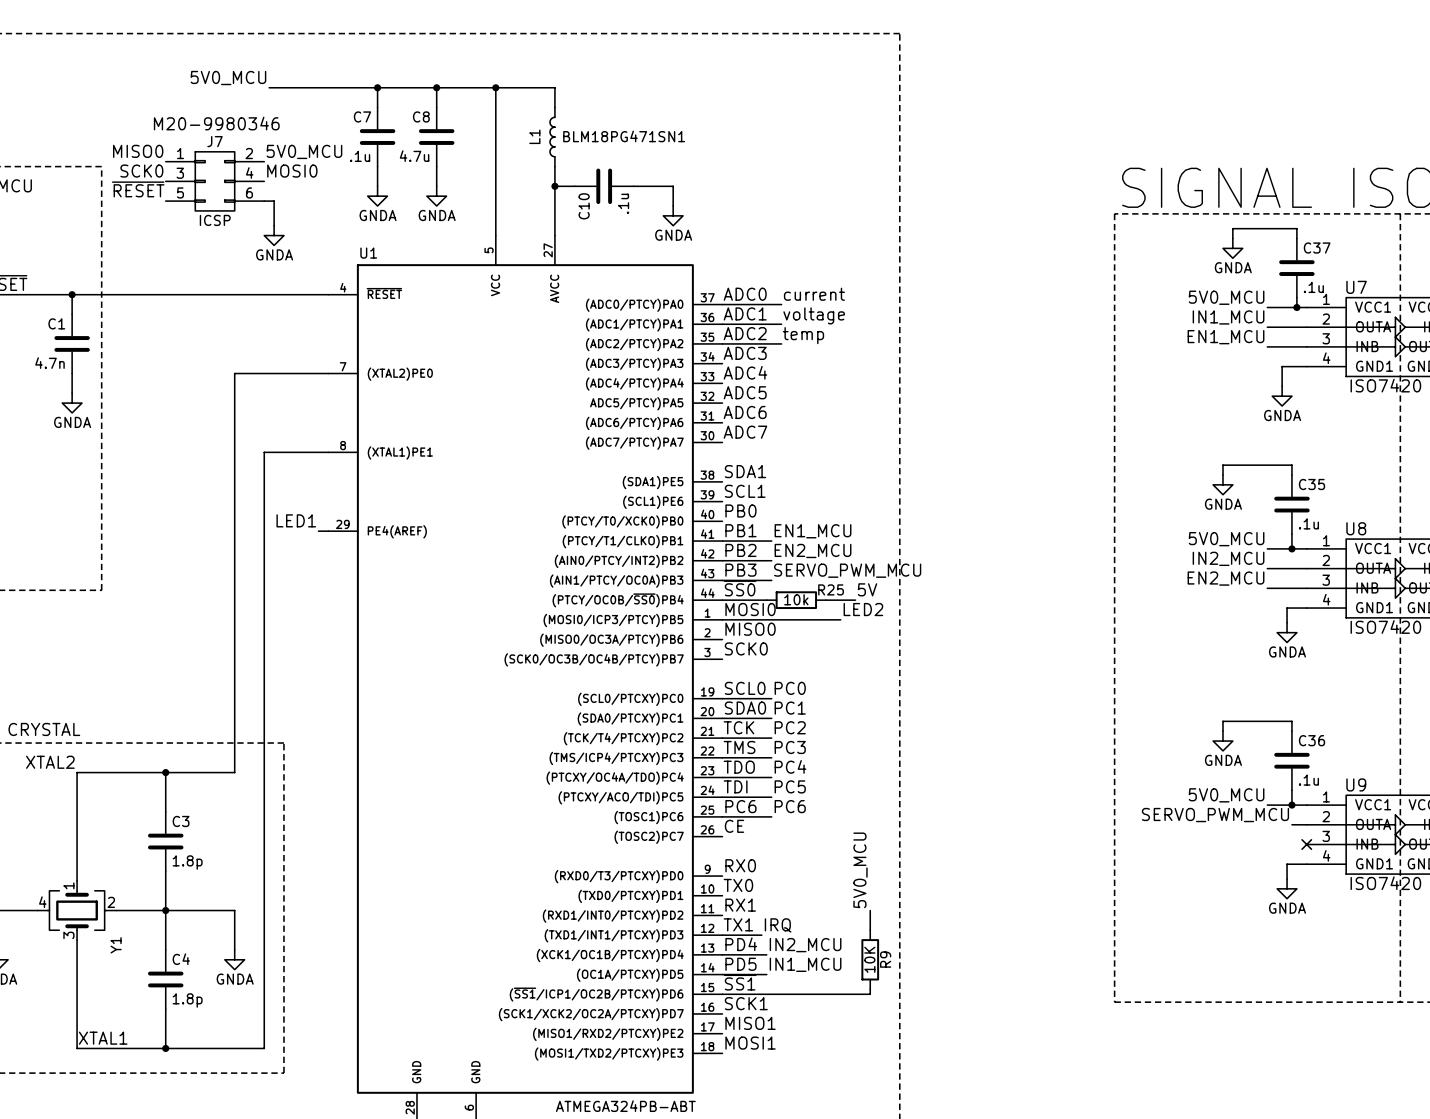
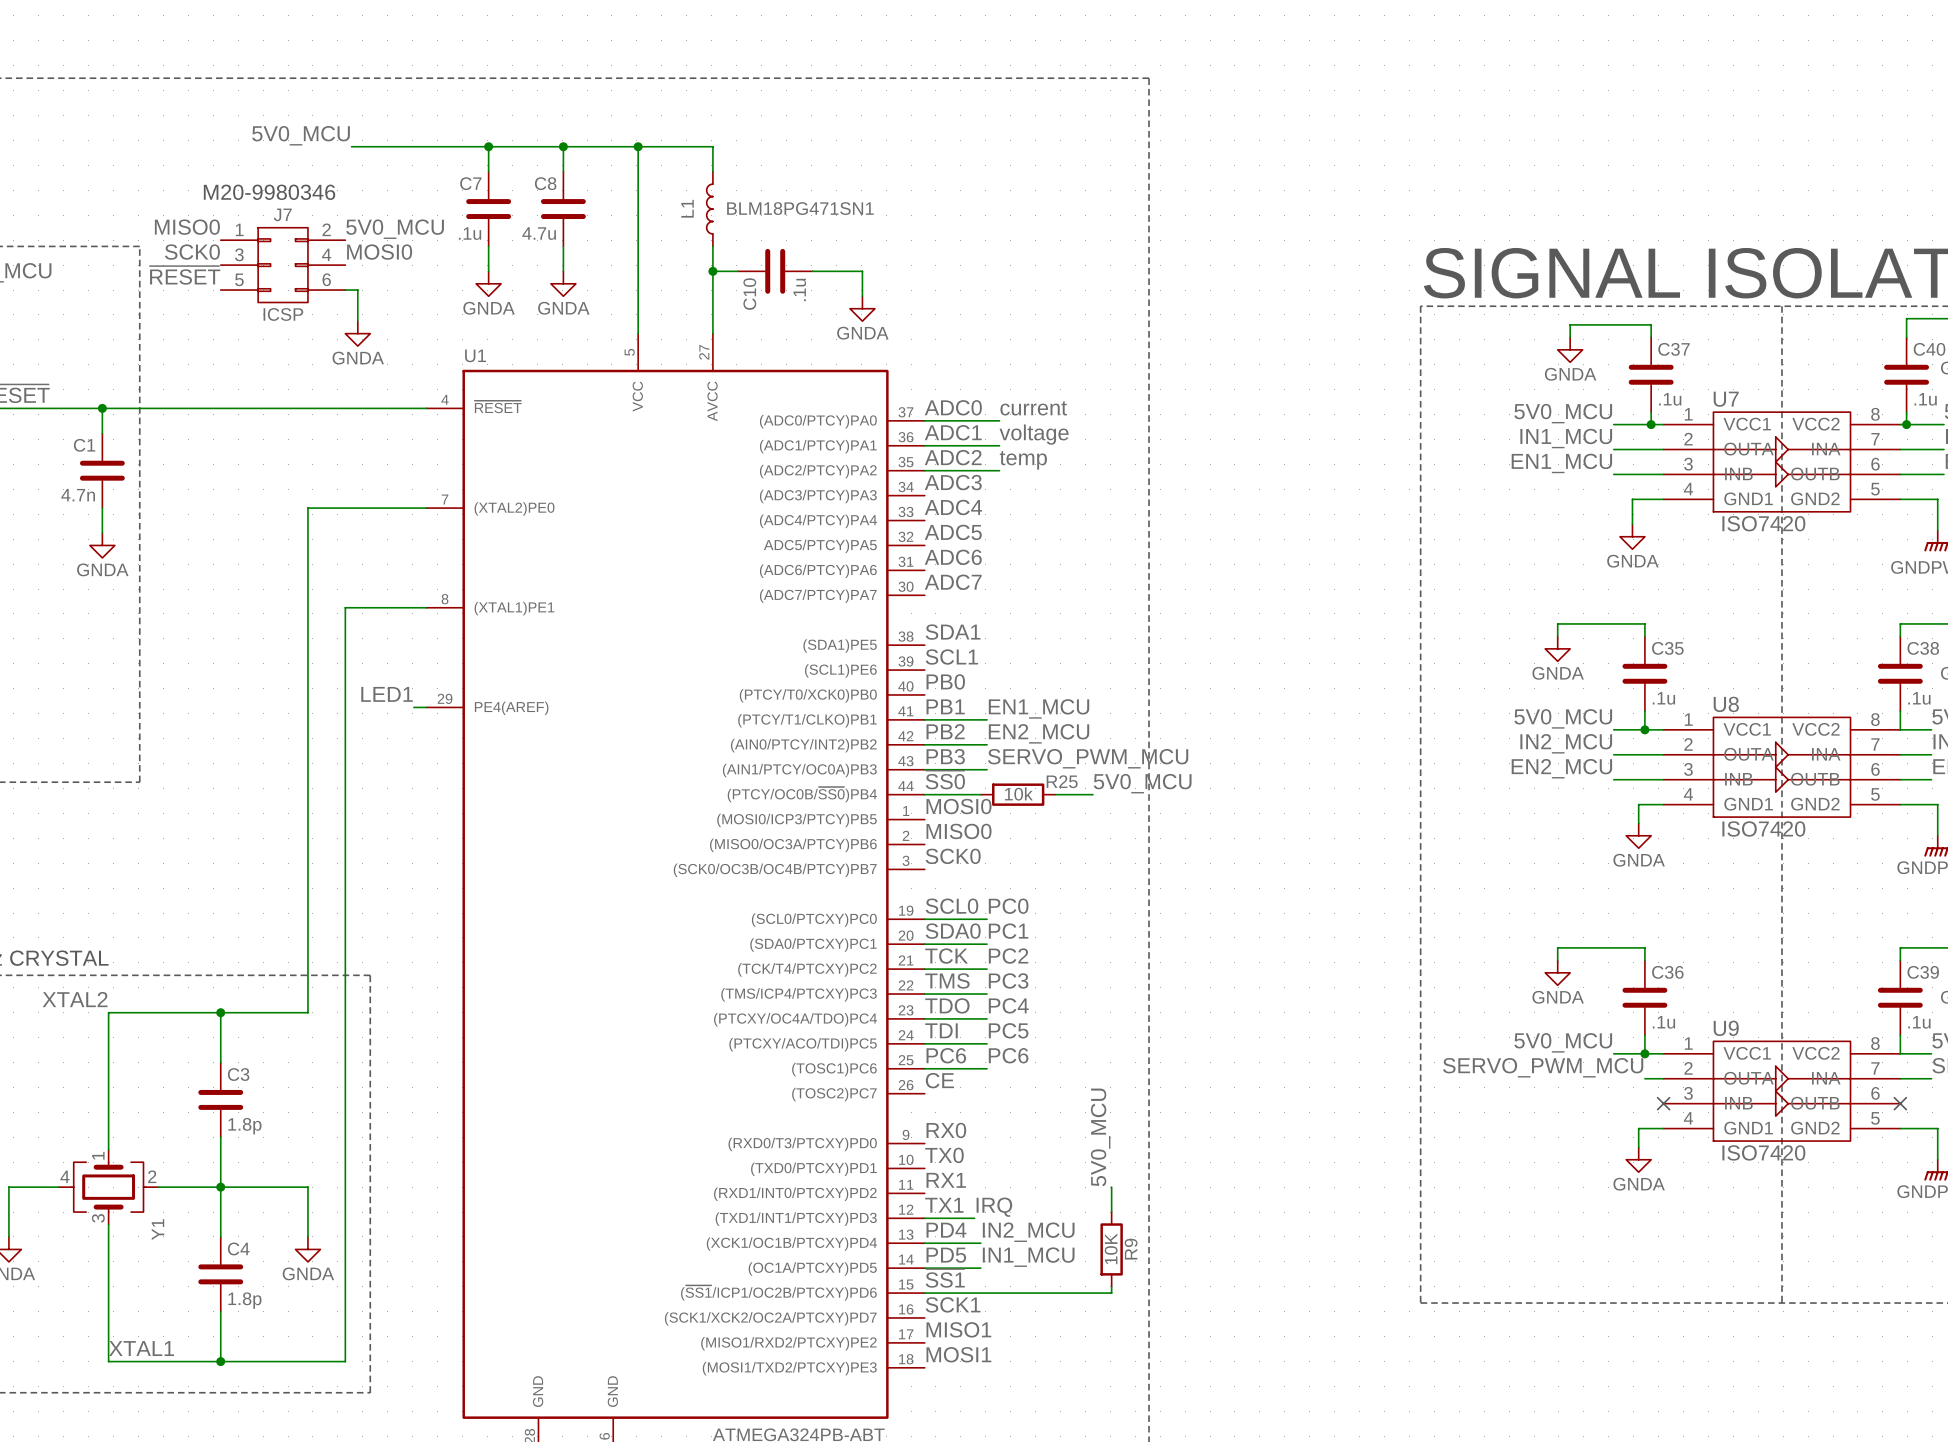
label: 5V (867, 589) -> 5V0_MCU (1142, 783)
label: LED2 (863, 609) -> none
wire: (722, 619) (840, 619) -> none

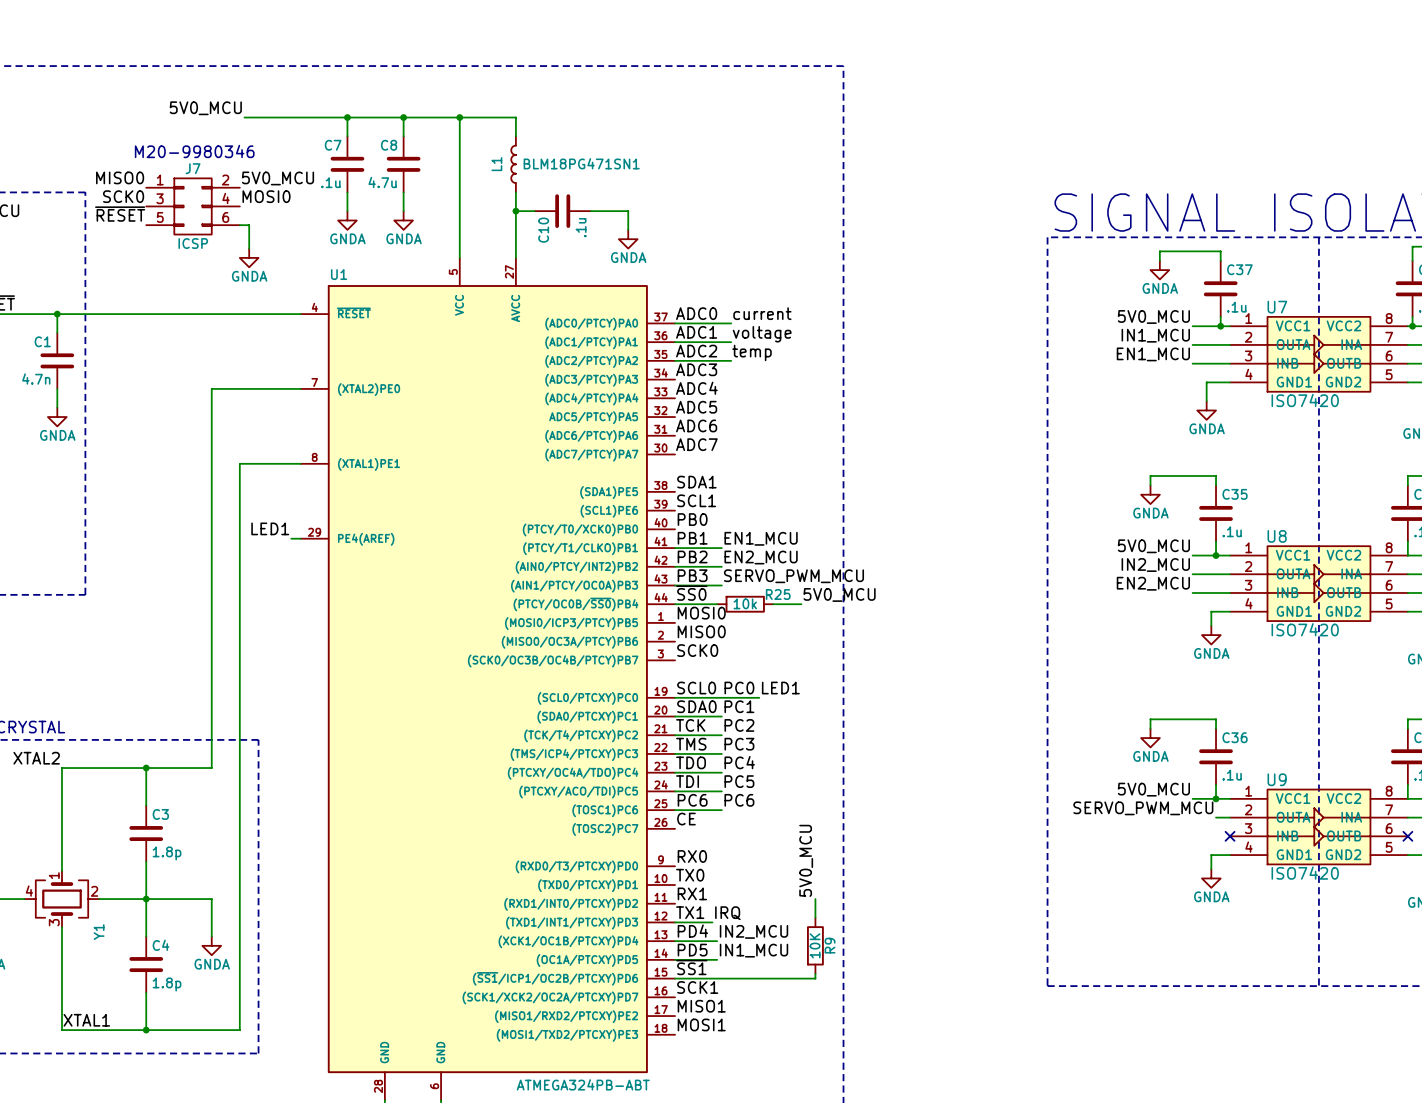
label: none -> LED1 (780, 688)
wire: none -> (721, 697) (759, 697)

